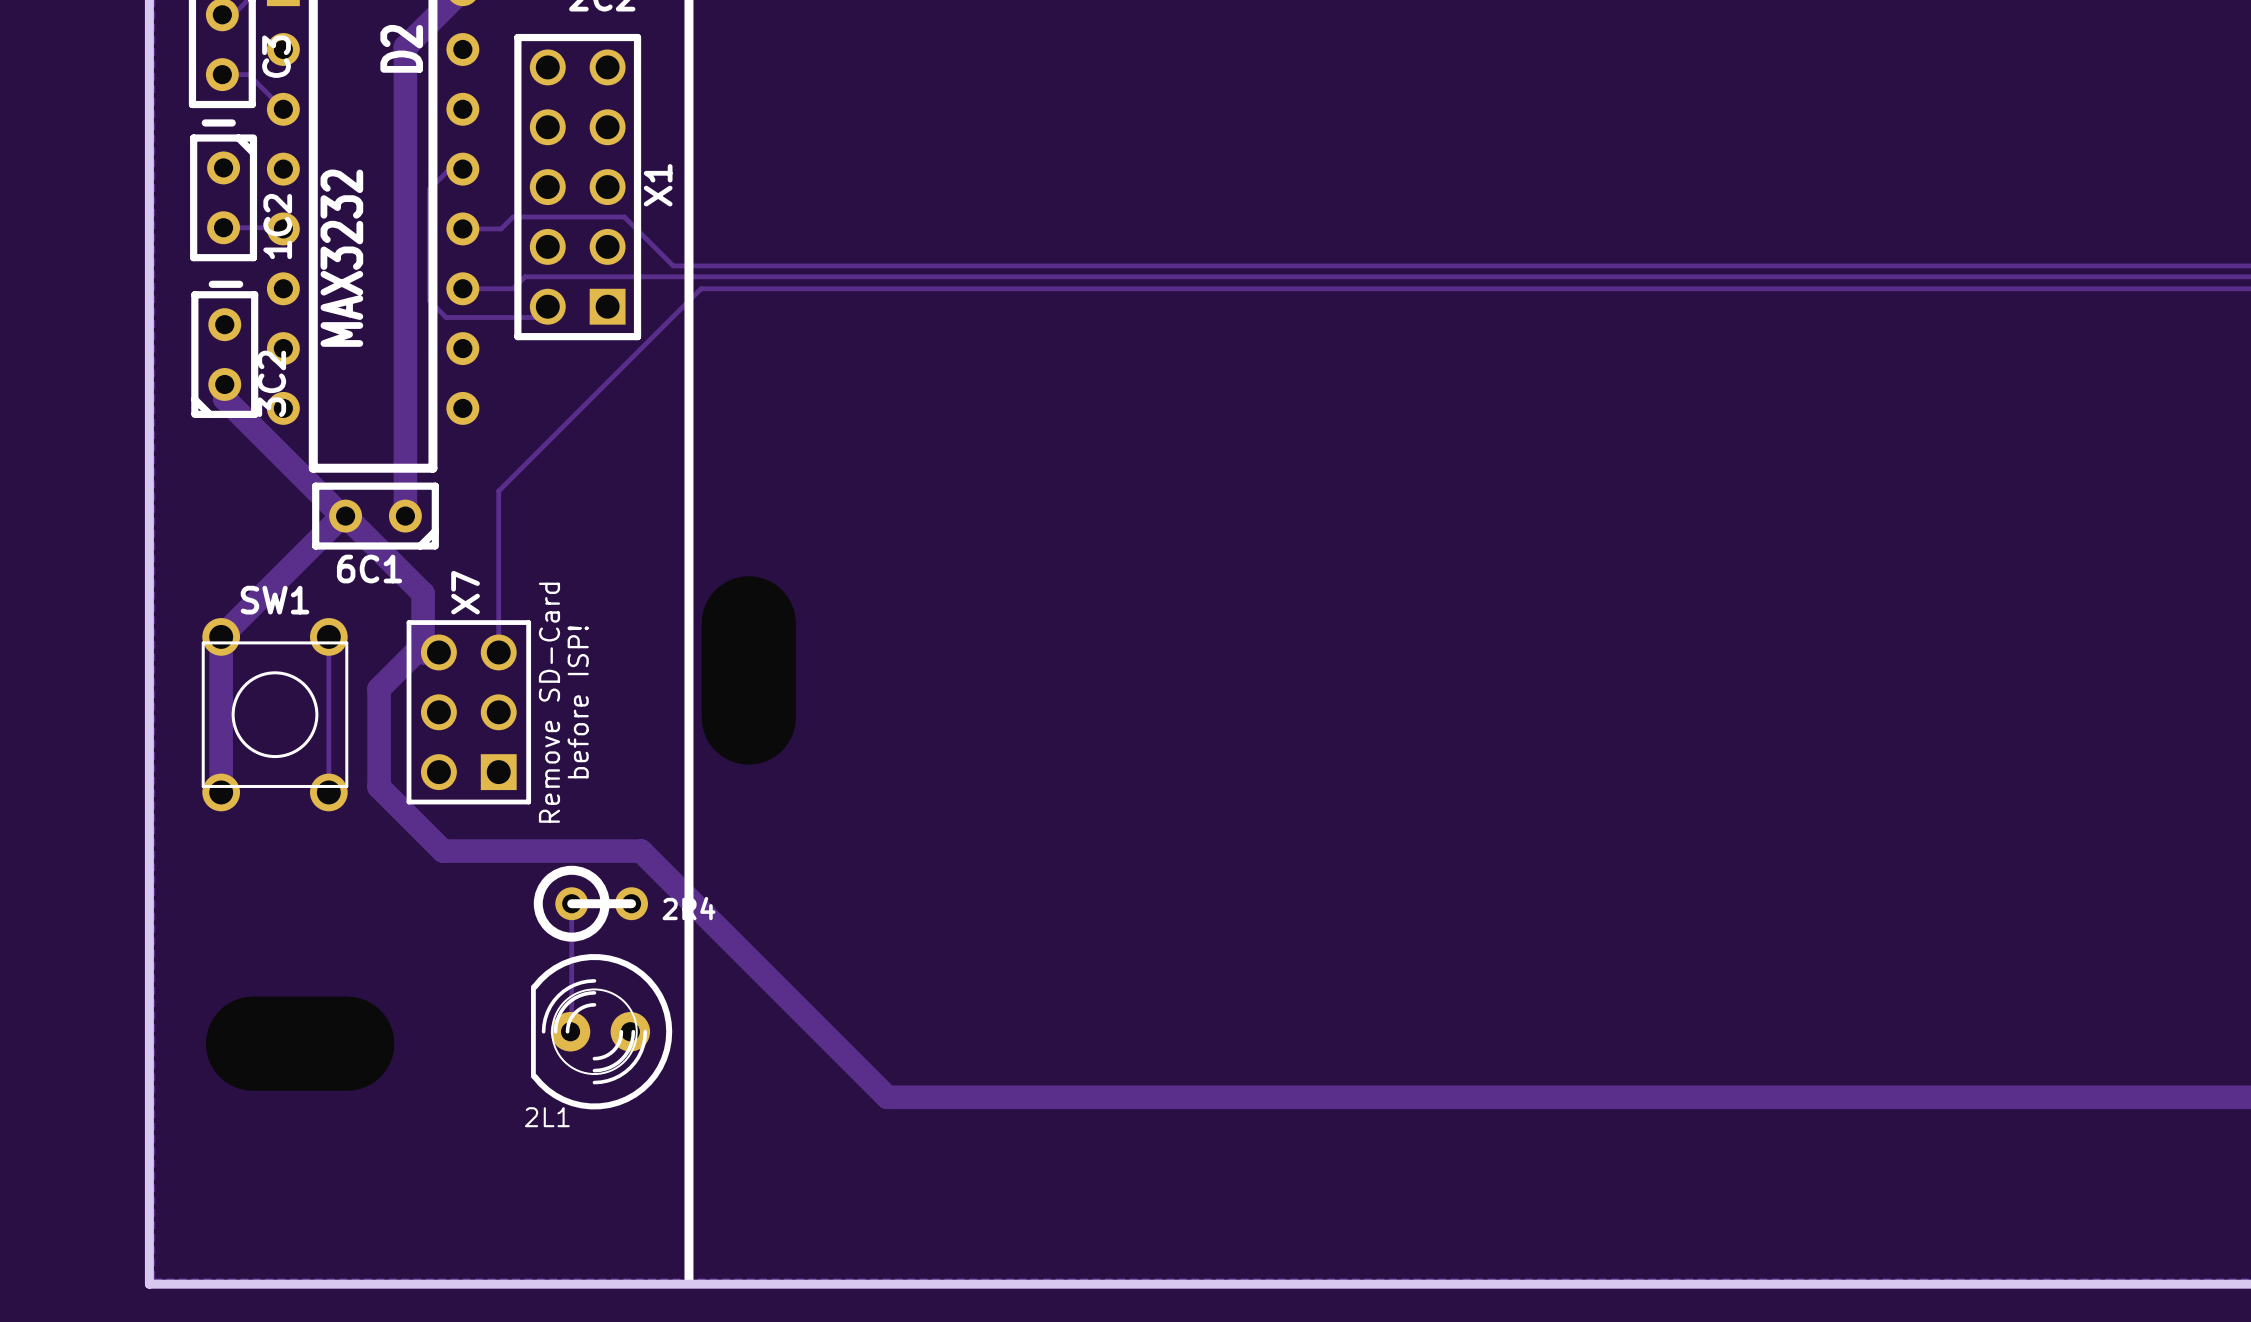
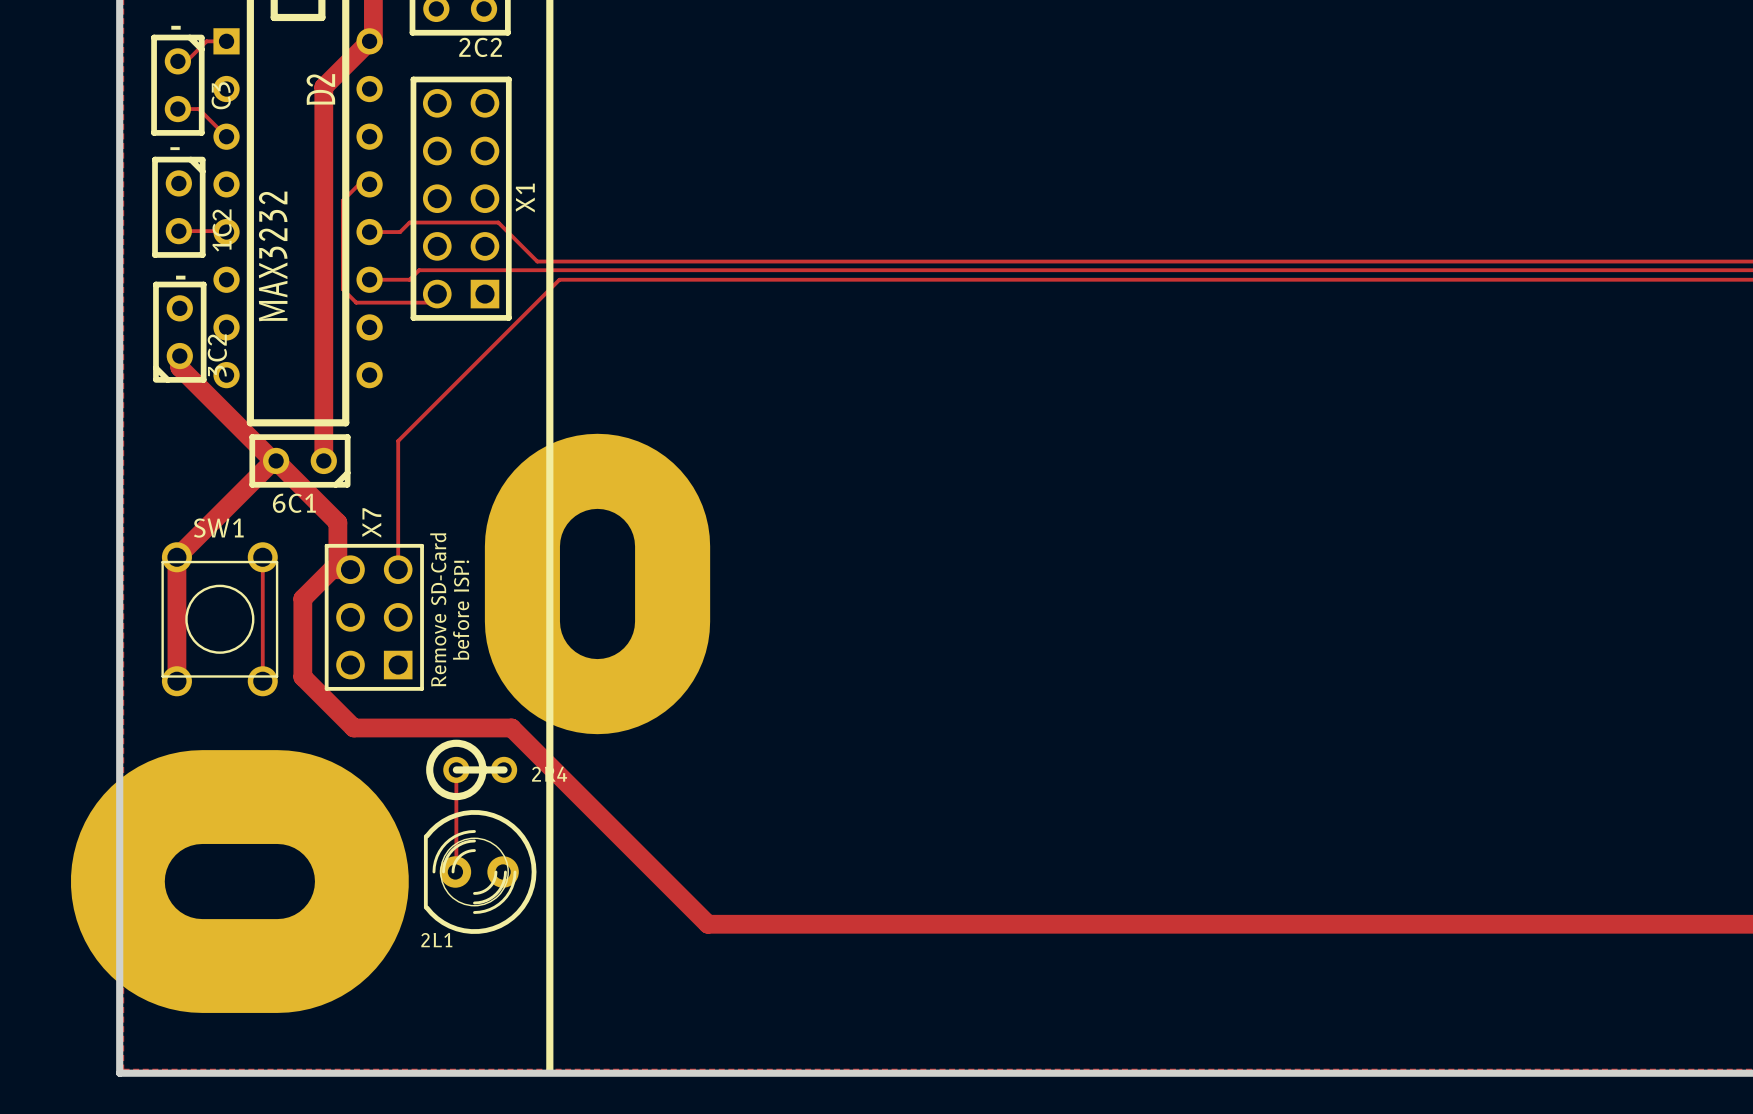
part footprint: [701, 576, 796, 765] -> [484, 433, 711, 735]
part footprint: [205, 996, 395, 1091] -> [70, 750, 409, 1013]

